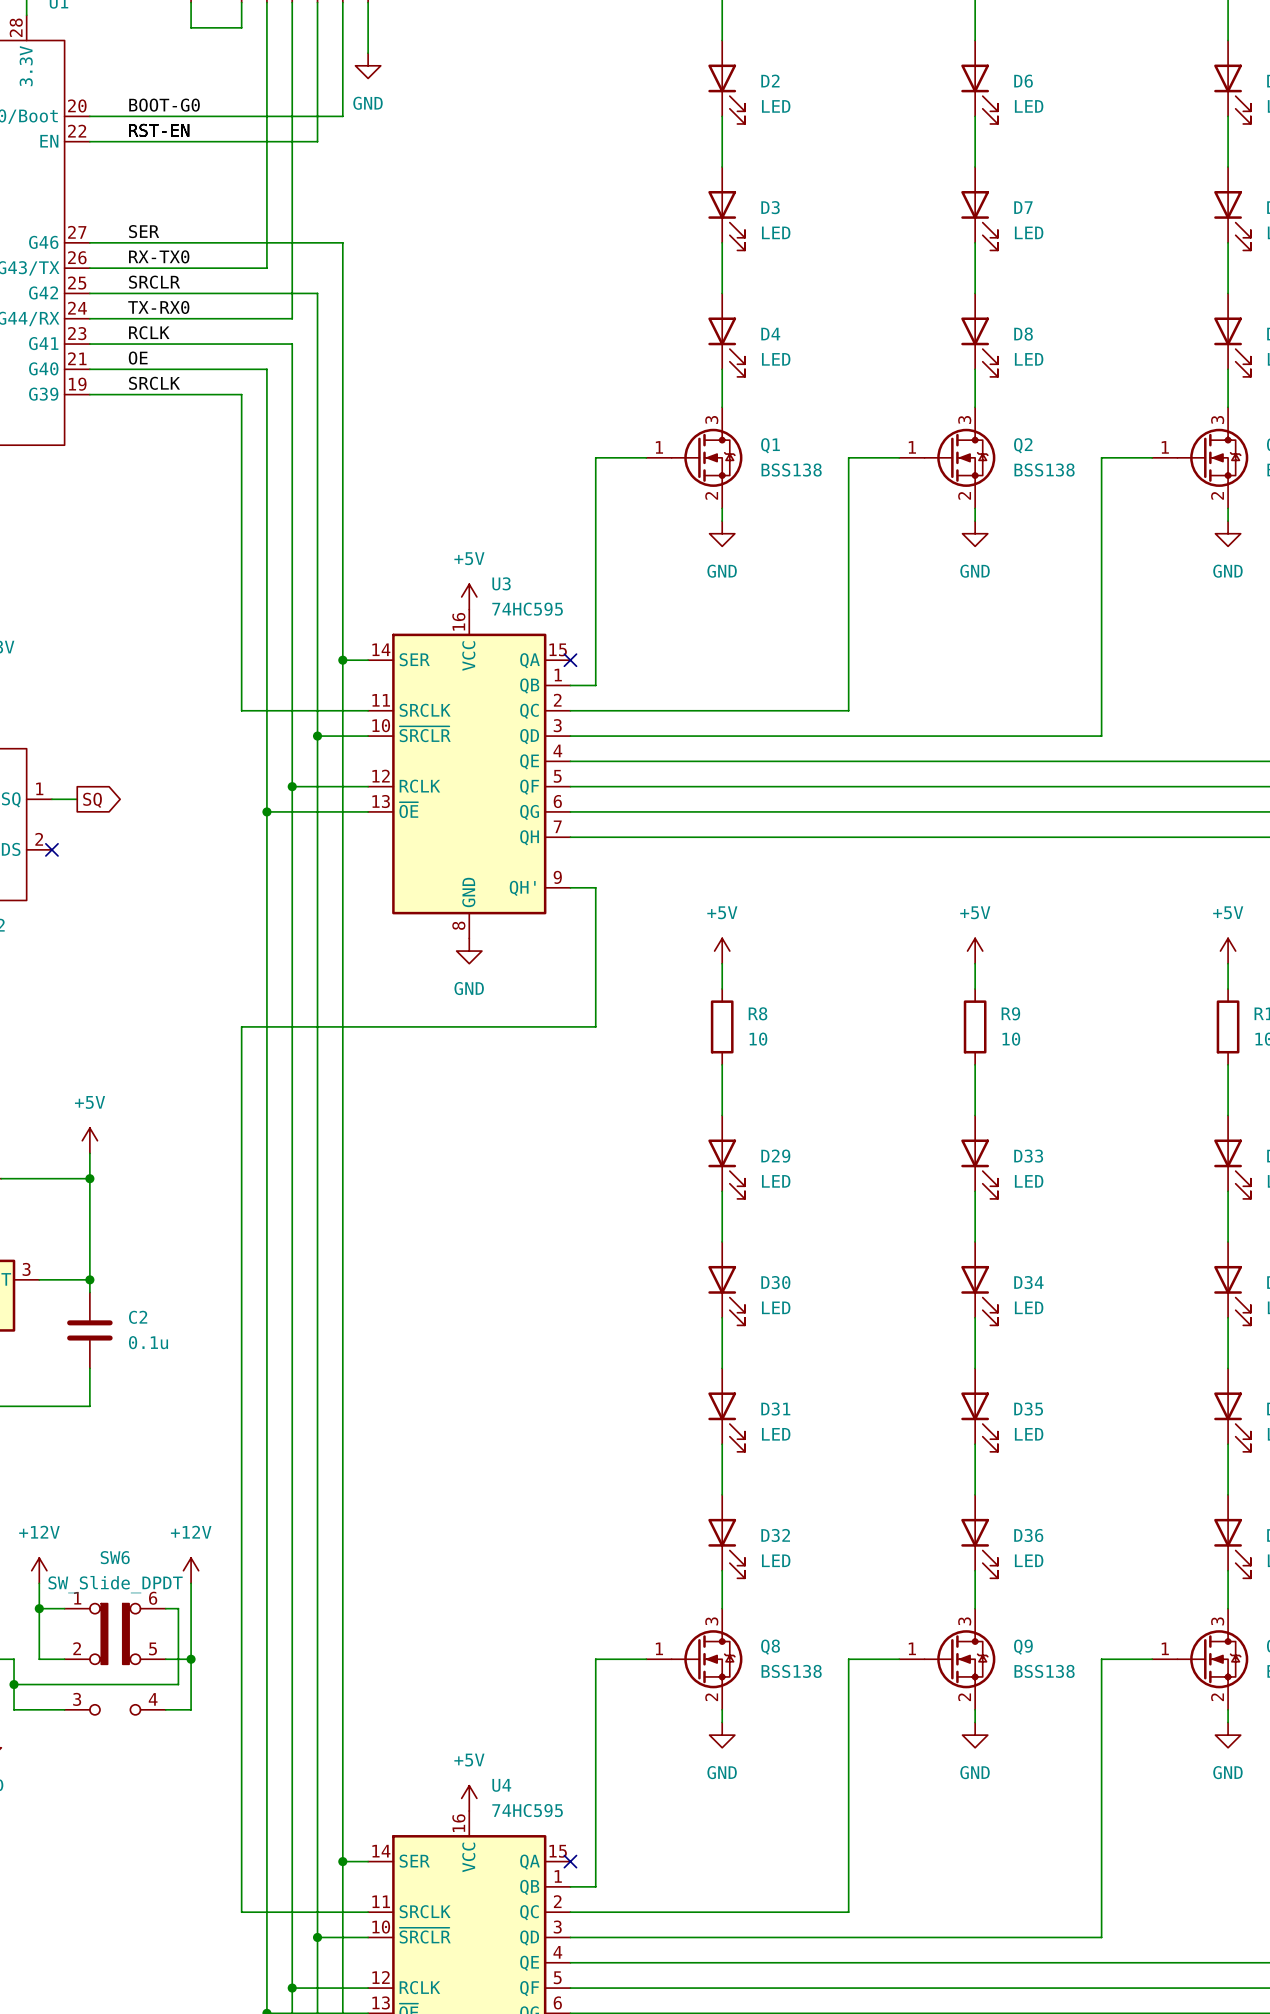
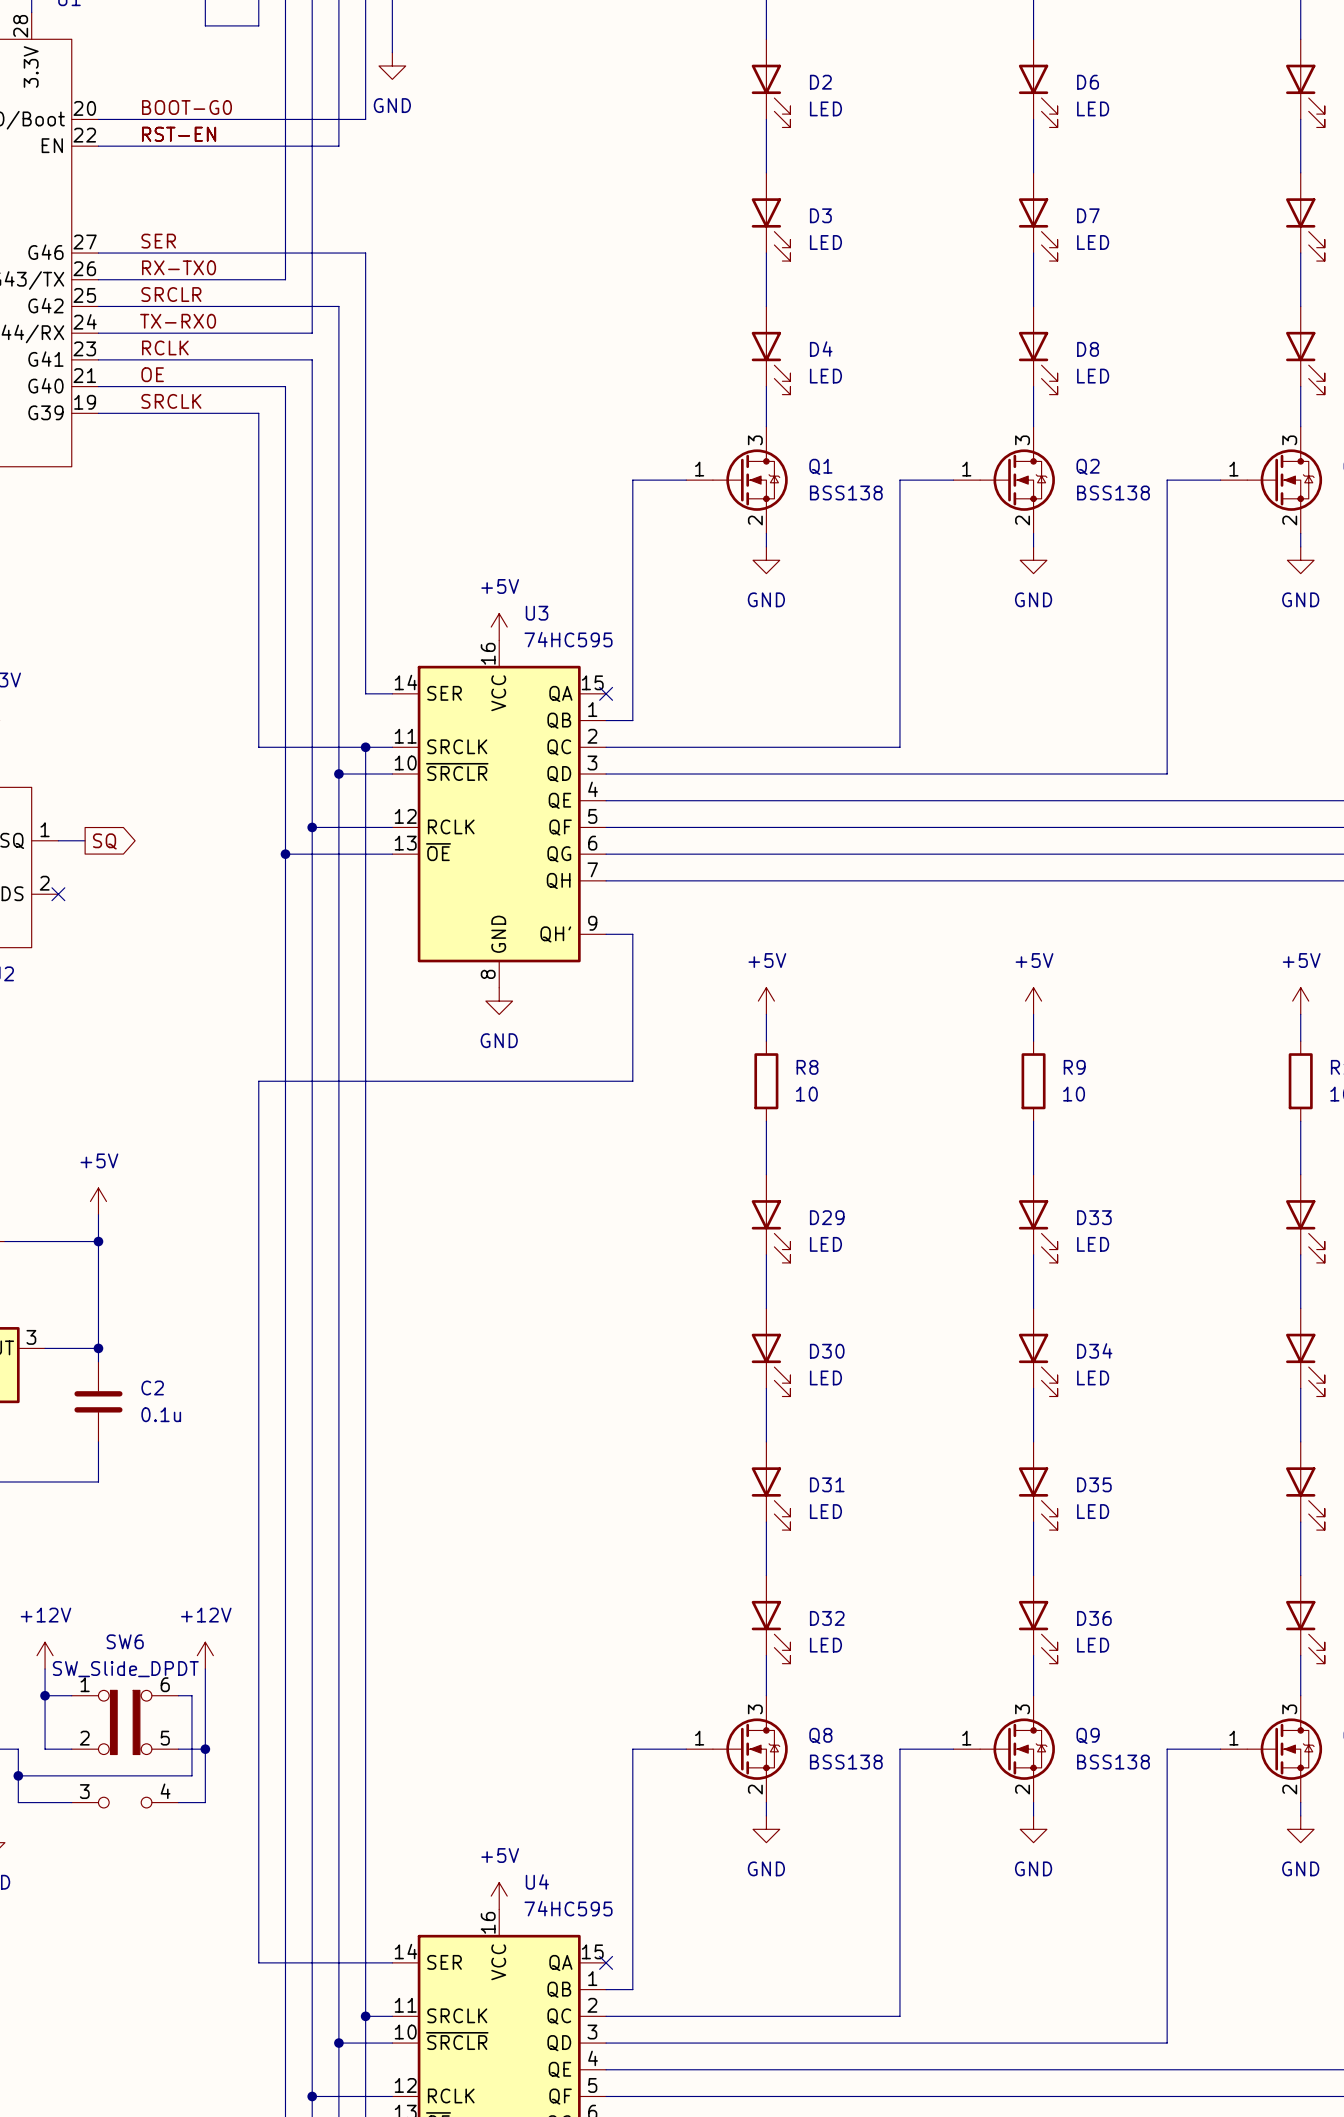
wire: (342, 660) (342, 710) -> none
junction position: (342, 660) -> (365, 747)
wire: (241, 1861) (241, 1912) (342, 1912) -> (258, 1962) (365, 1962)
junction position: (342, 1861) -> (365, 2016)

